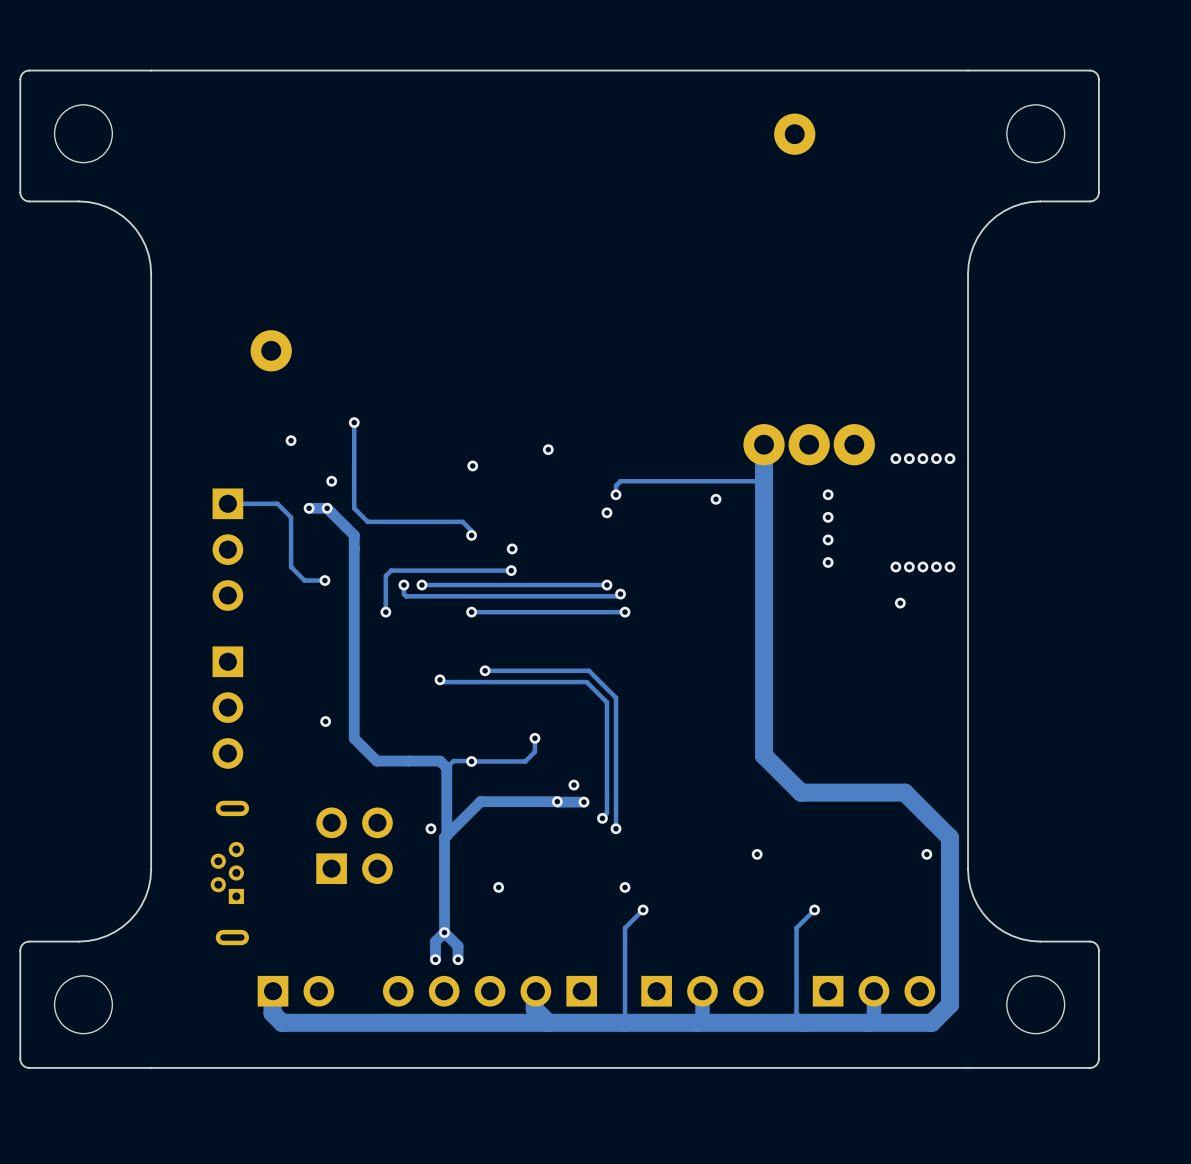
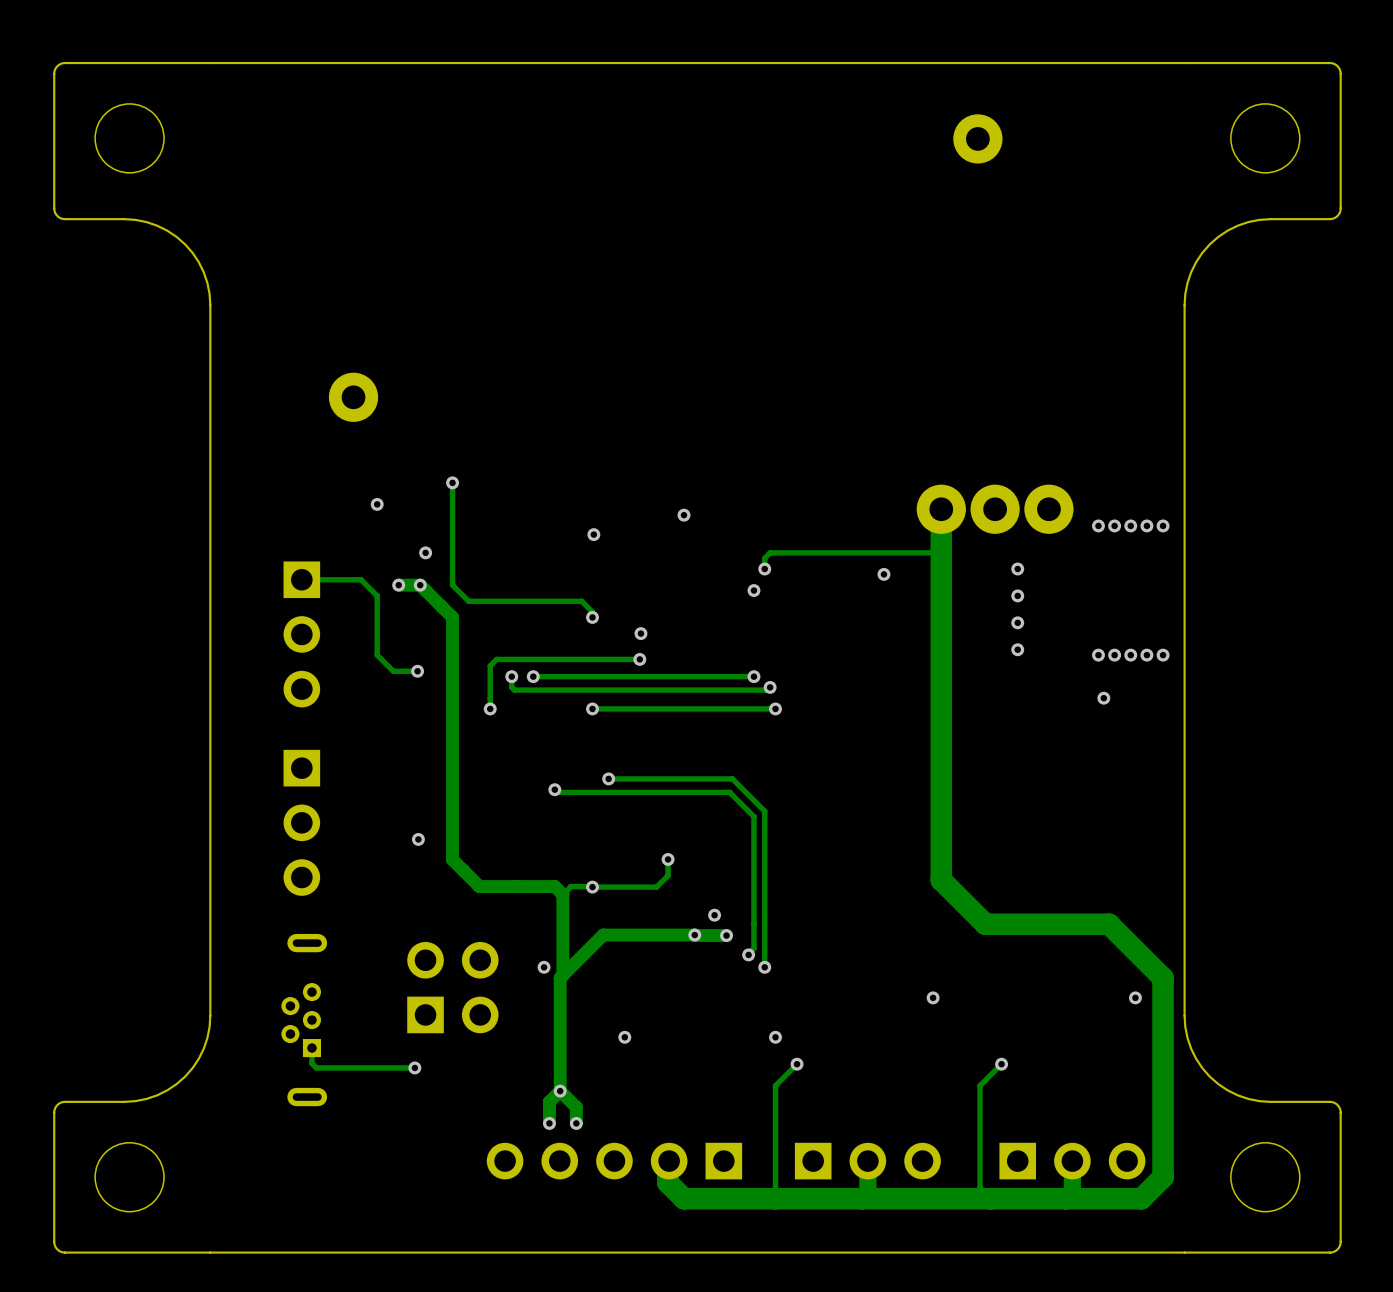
track: none -> (311, 1048) (311, 1063) (316, 1067) (414, 1067)
via: none -> (414, 1067)
track: (272, 991) (272, 1013) (282, 1022) (548, 1022) -> none
part: (295, 991) -> none

